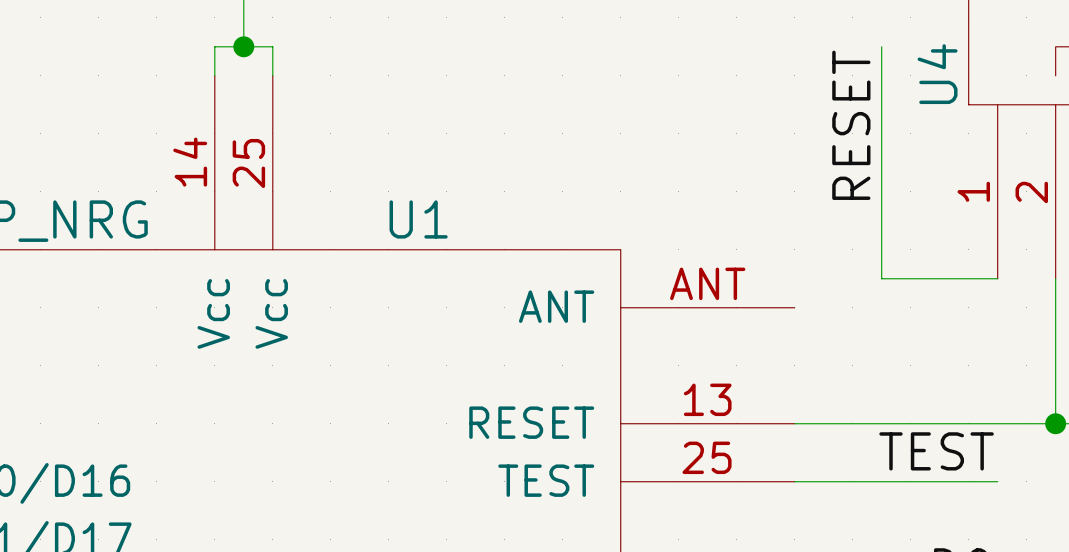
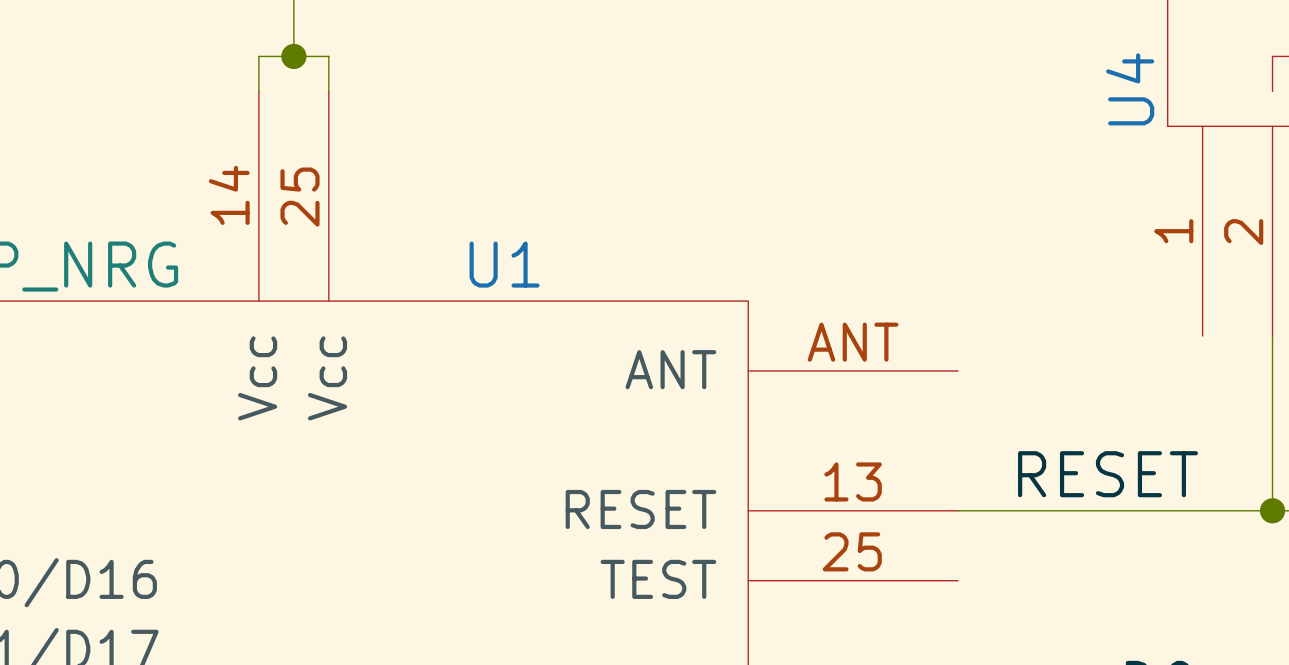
wire: (881, 46) (881, 278) (997, 278) -> none
label rotation: 0° (851, 125) -> 90° clockwise (1107, 474)
label position: RESET (851, 125) -> RESET (1107, 474)
label: TEST (936, 451) -> none
wire: (794, 481) (997, 481) -> none

